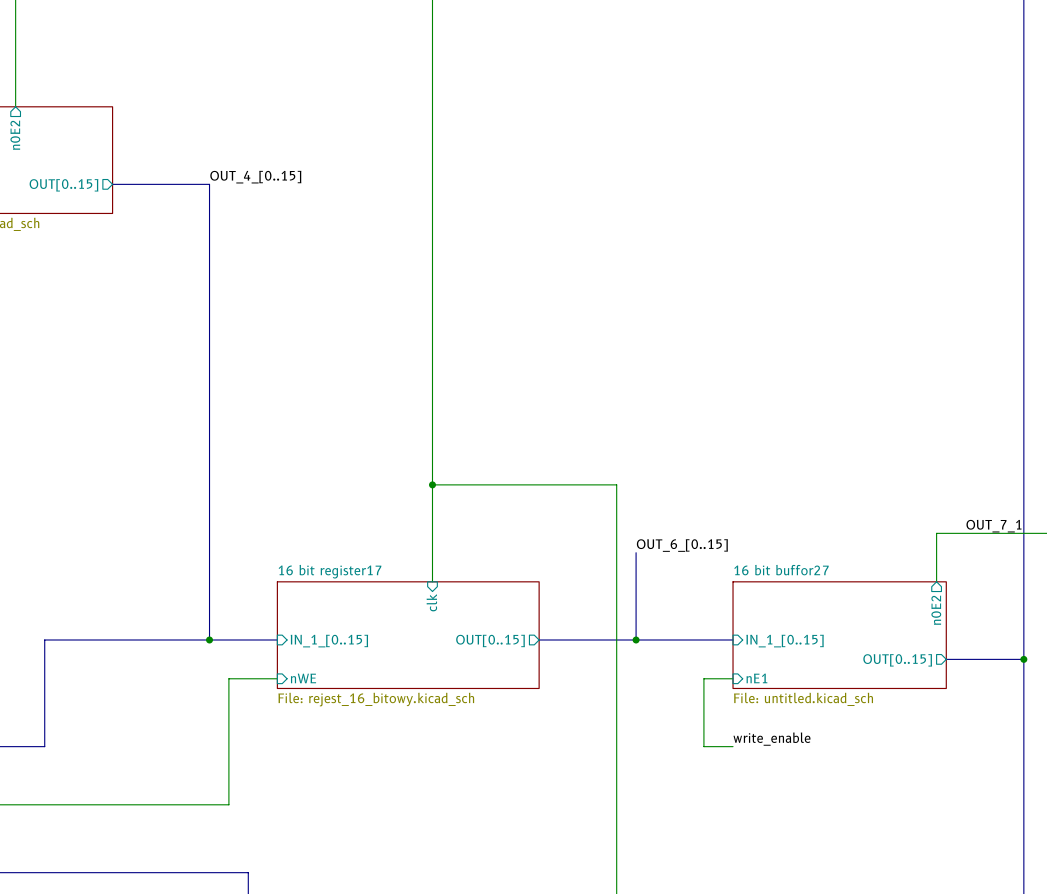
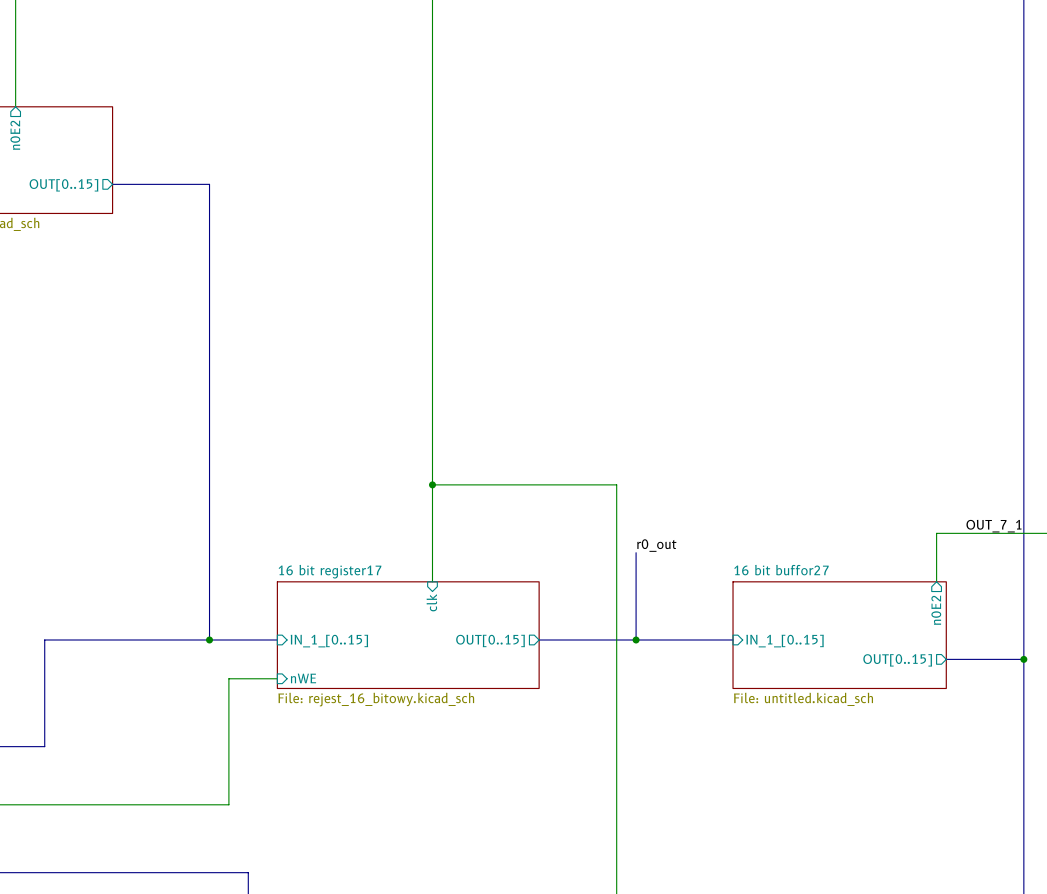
label: OUT_4_[0..15] (255, 177) -> none
label: OUT_6_[0..15] (682, 545) -> r0_out (656, 545)
wire: (733, 678) (703, 678) (703, 746) (733, 746) -> none
sheet pin: nE1 (756, 678) -> none
label: write_enable (771, 739) -> none

